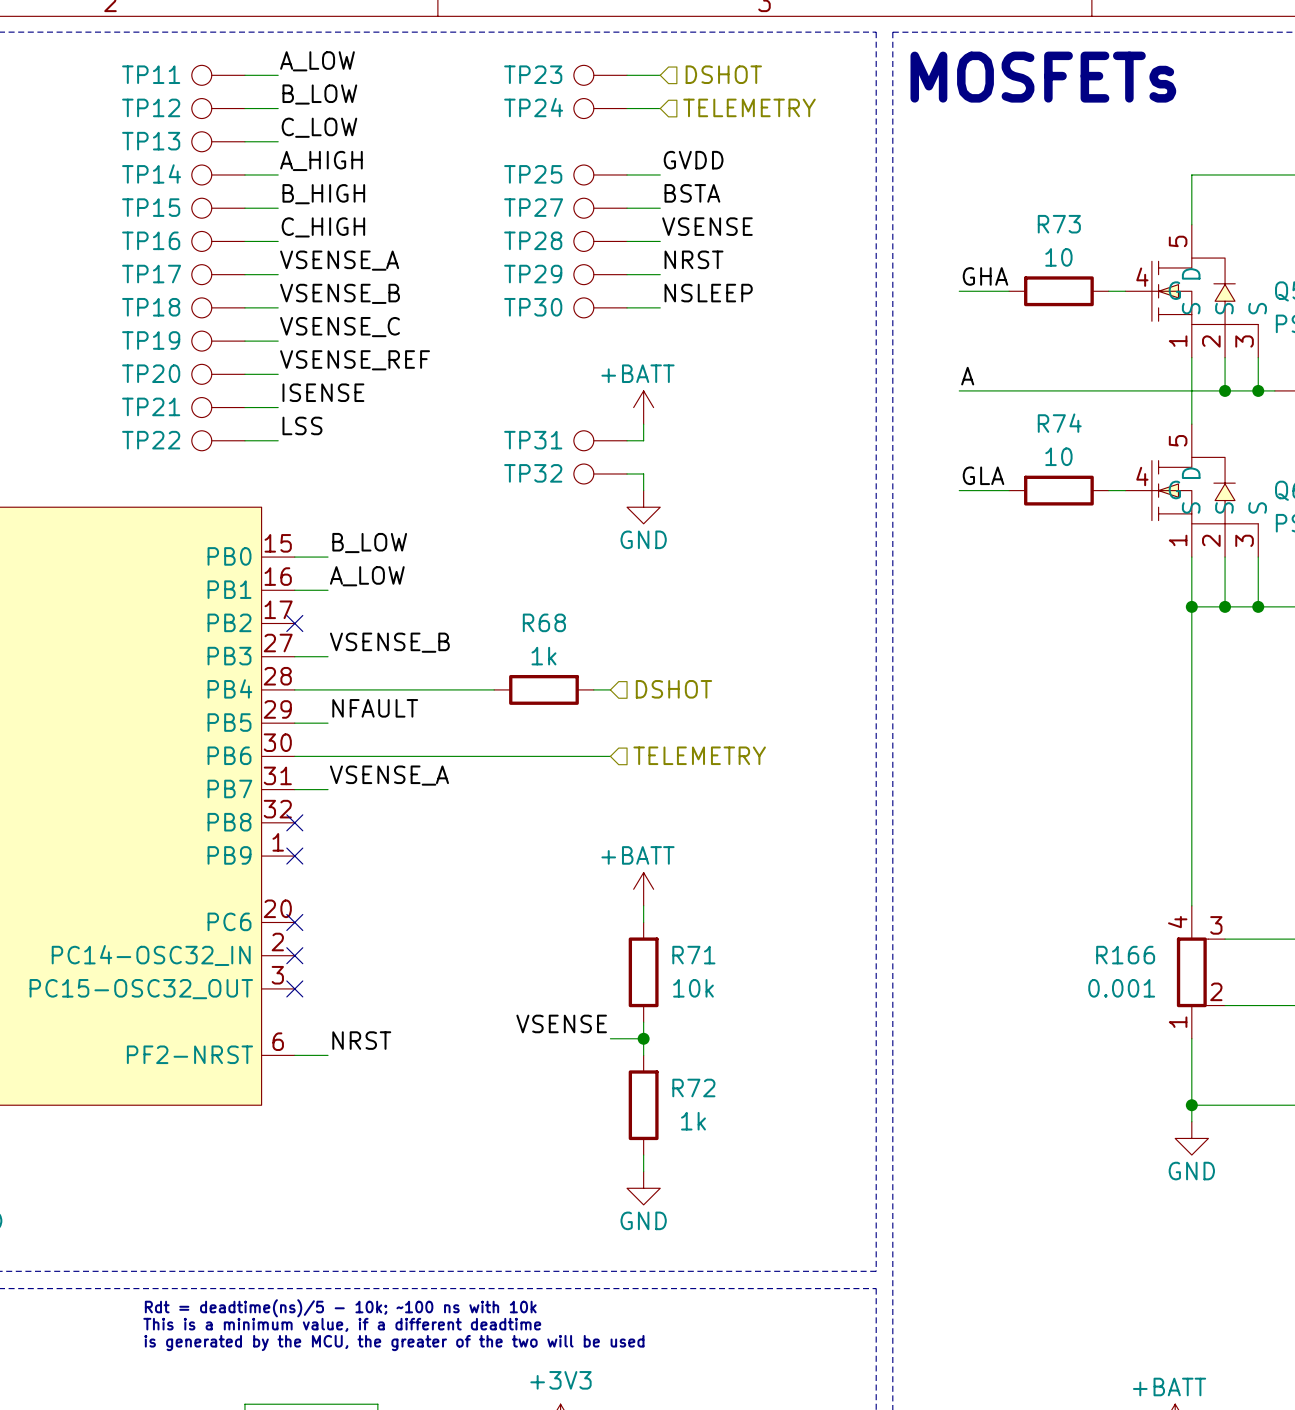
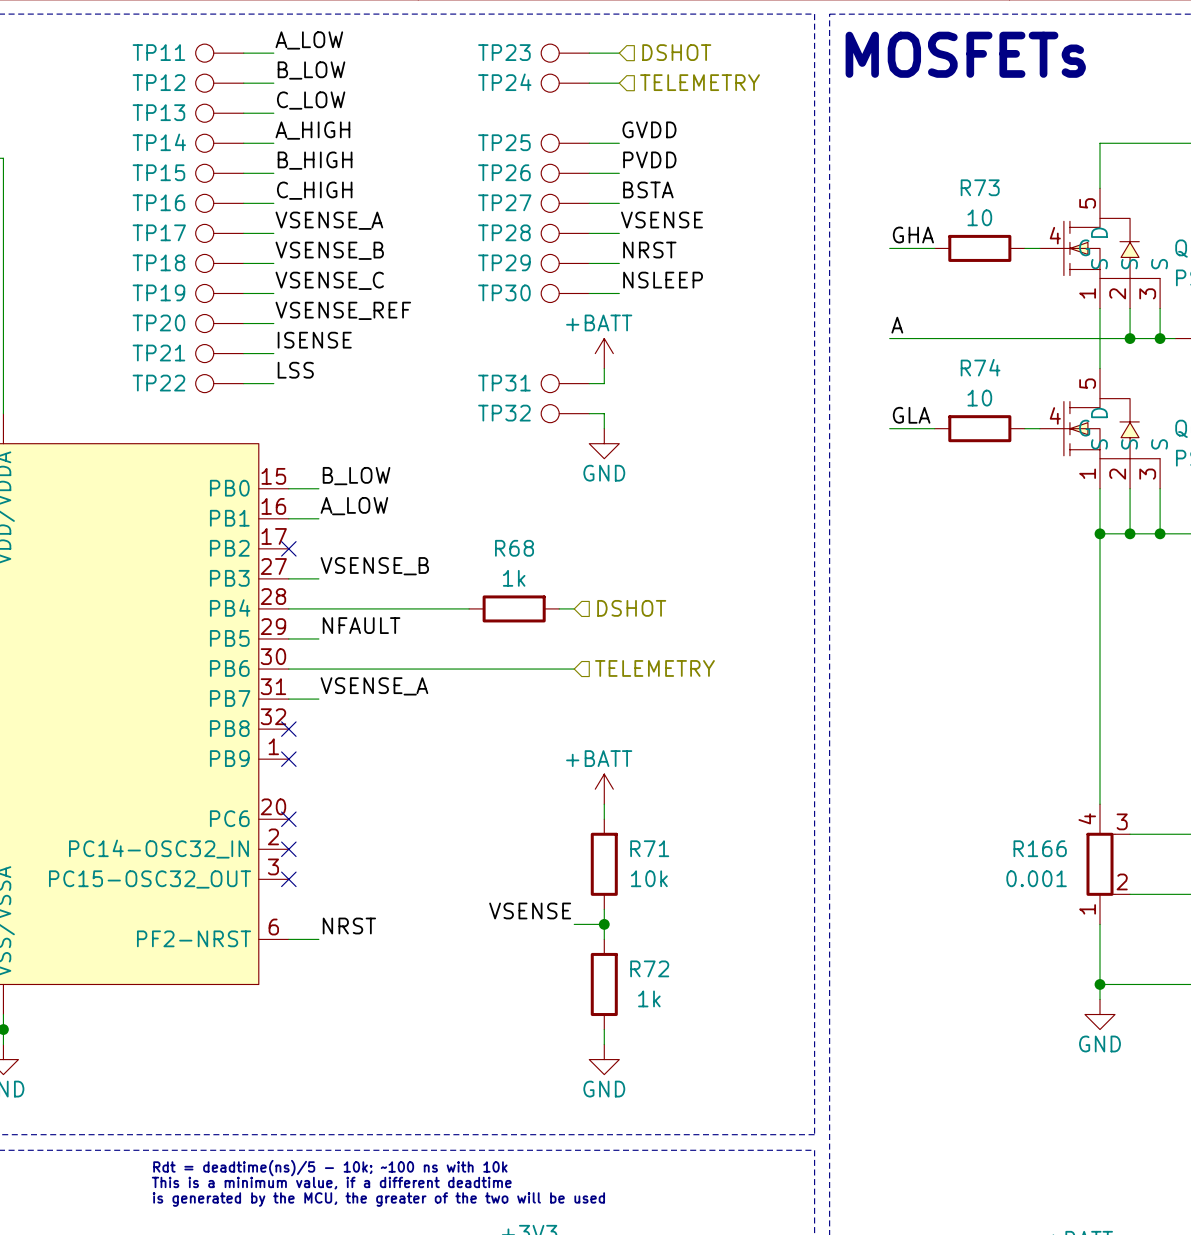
label: BSTA (692, 193) -> PVDD (649, 159)
TP27 name: TP27 (533, 207) -> TP26 (504, 172)
label: VSENSE (707, 226) -> BSTA (648, 189)
TP28 name: TP28 (533, 240) -> TP27 (504, 202)
label: NRST (694, 259) -> VSENSE (661, 220)
TP29 name: TP29 (533, 274) -> TP28 (504, 232)
label: NSLEEP (708, 293) -> NRST (649, 250)
TP30 name: TP30 (533, 307) -> TP29 (504, 262)
label: none -> NSLEEP (663, 280)
TP30: none -> (565, 293)
wire: none -> (589, 293) (619, 293)

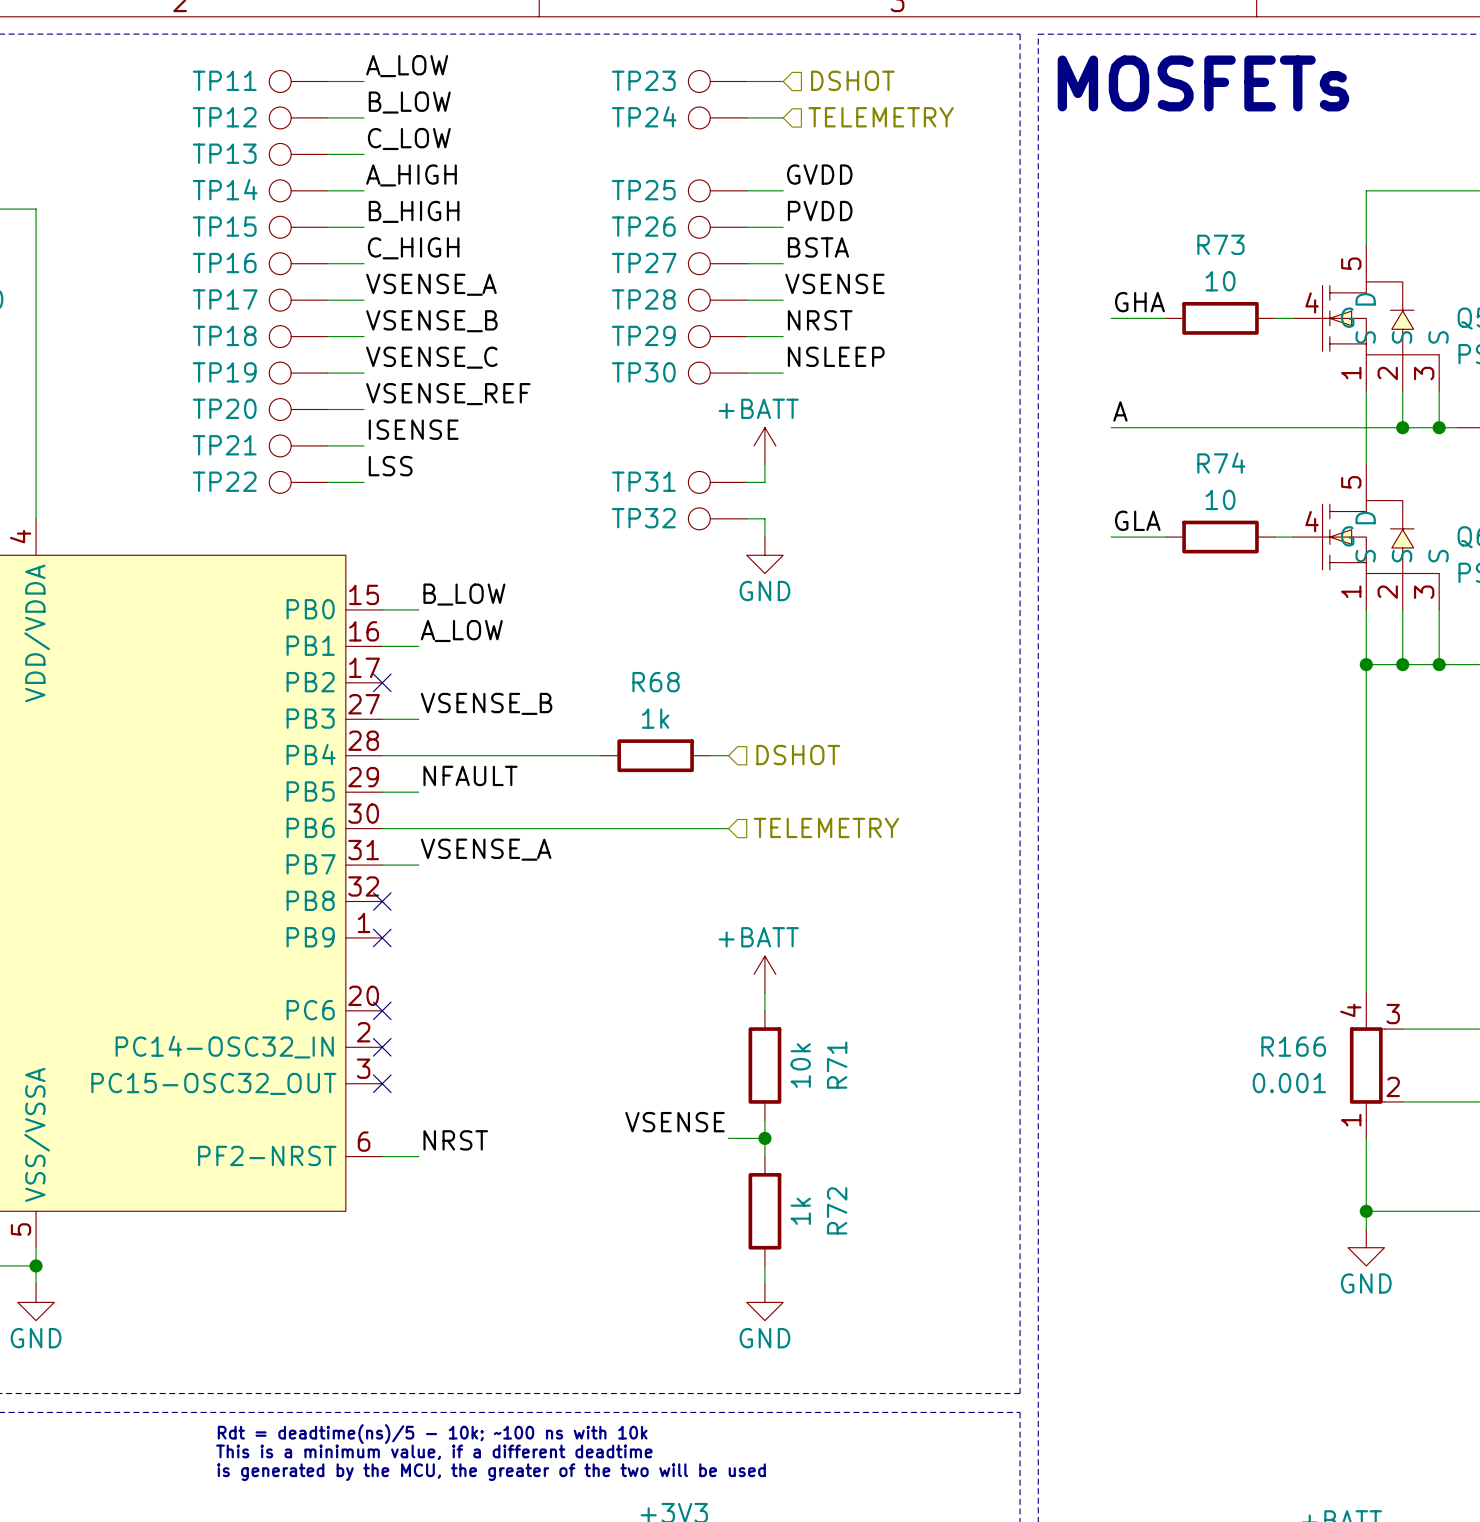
R71 name rotation: 0° (649, 848) -> 90° counterclockwise (837, 1065)
R71 value rotation: 0° (649, 878) -> 90° counterclockwise (800, 1065)
R72 name rotation: 0° (649, 968) -> 90° counterclockwise (837, 1210)
R72 value rotation: 0° (649, 998) -> 90° counterclockwise (800, 1211)

